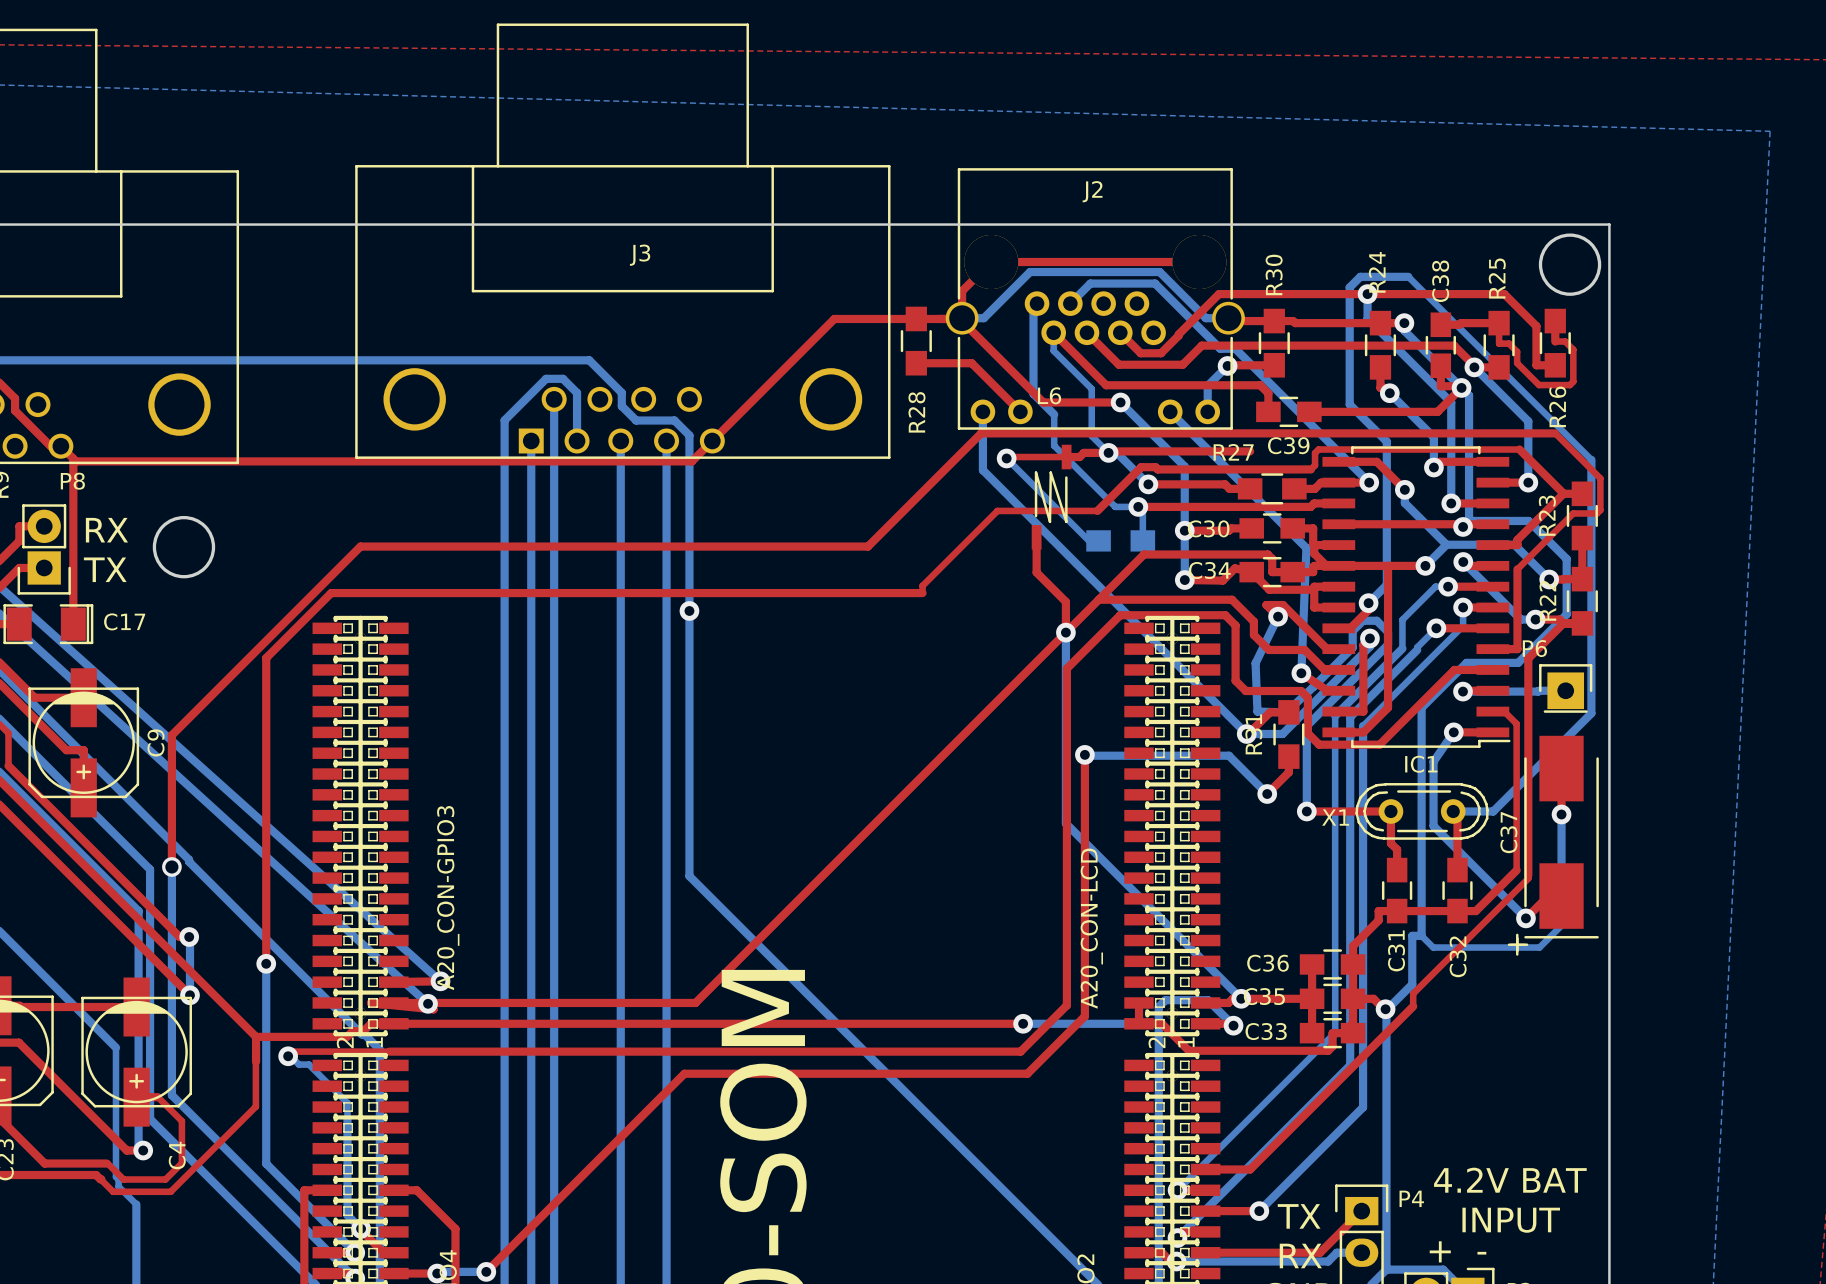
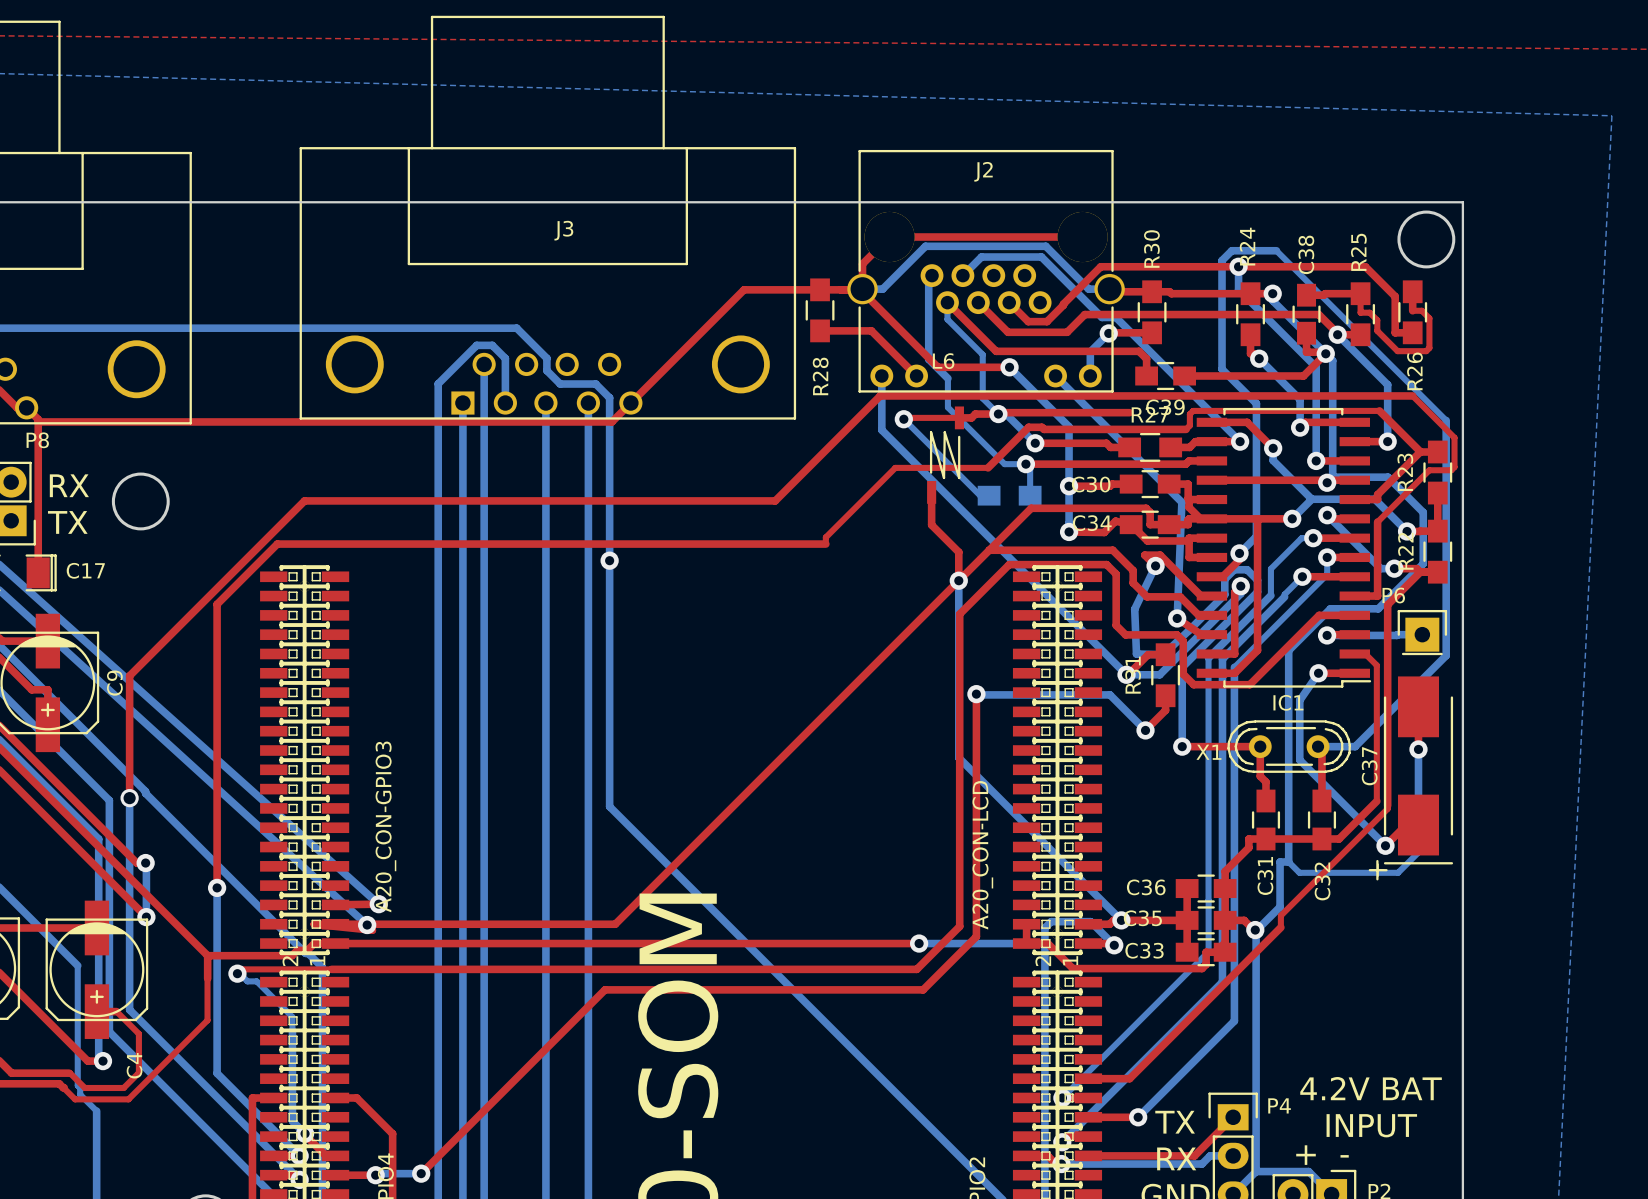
R27 name position: R27 (1233, 452) -> R27 (1150, 414)

